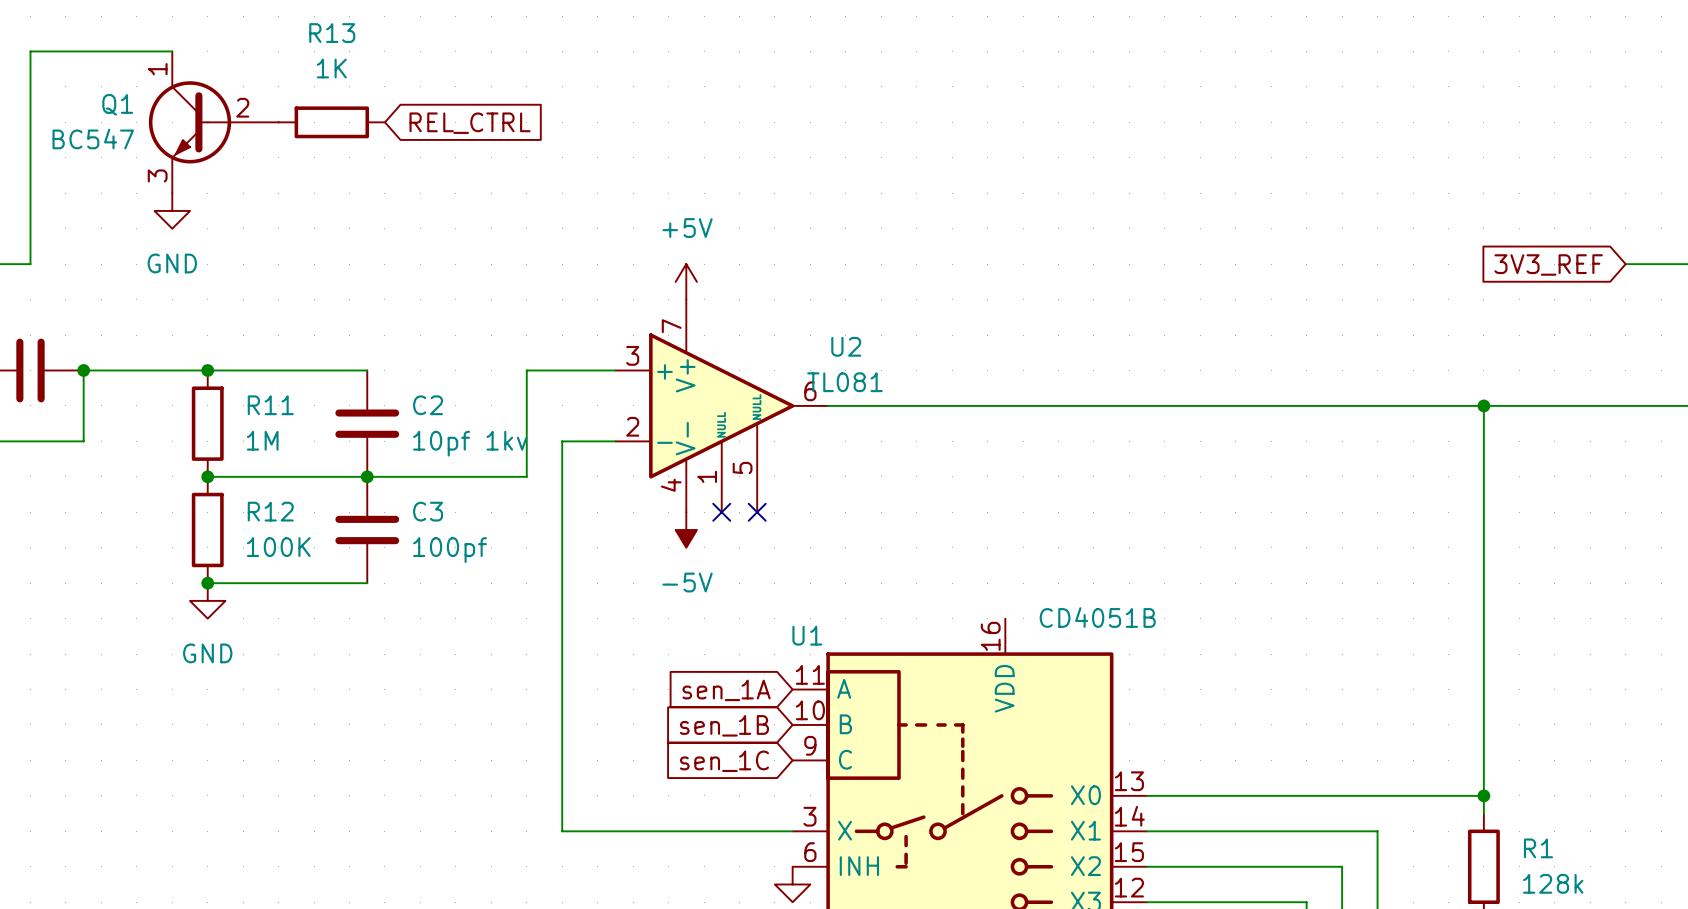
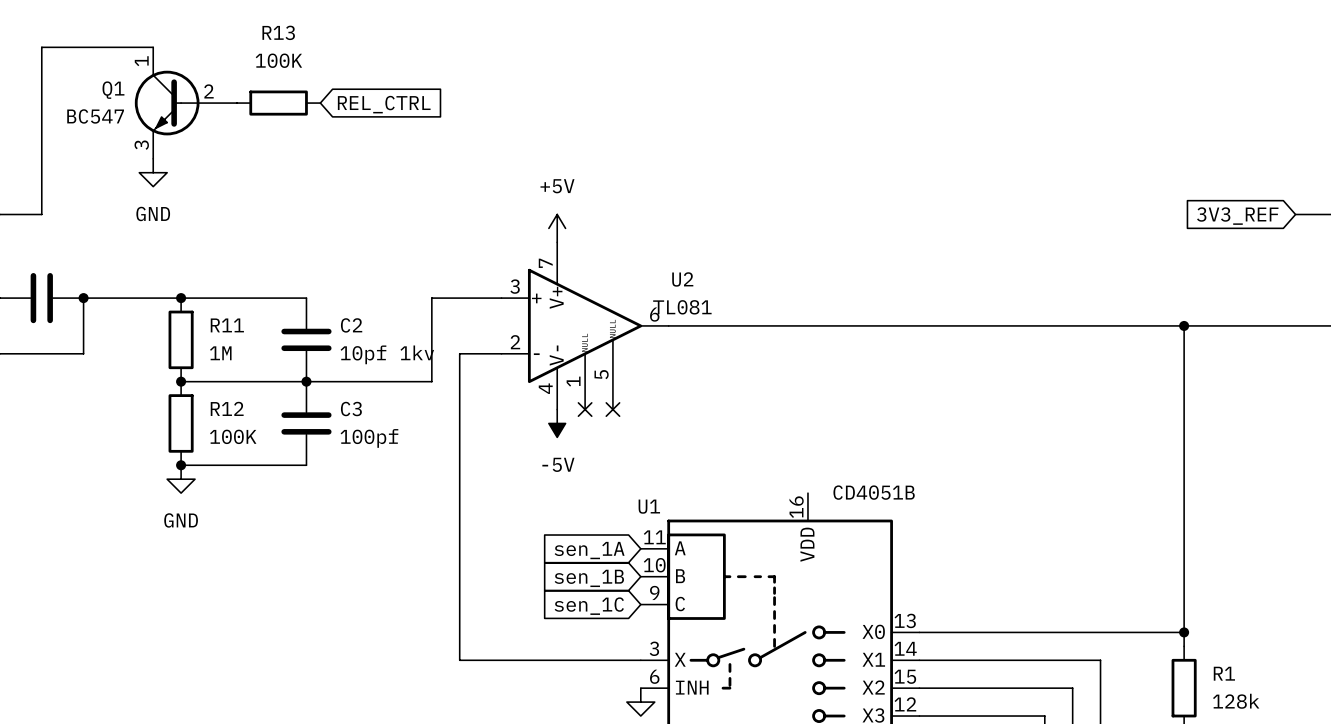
R13 value: 1K (331, 68) -> 100K (278, 60)

